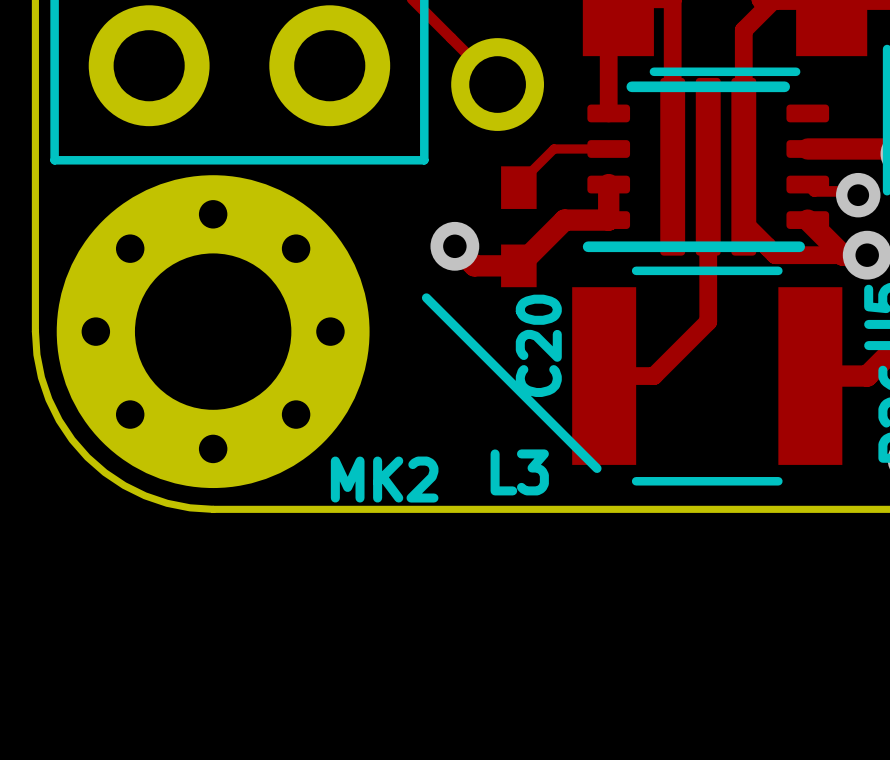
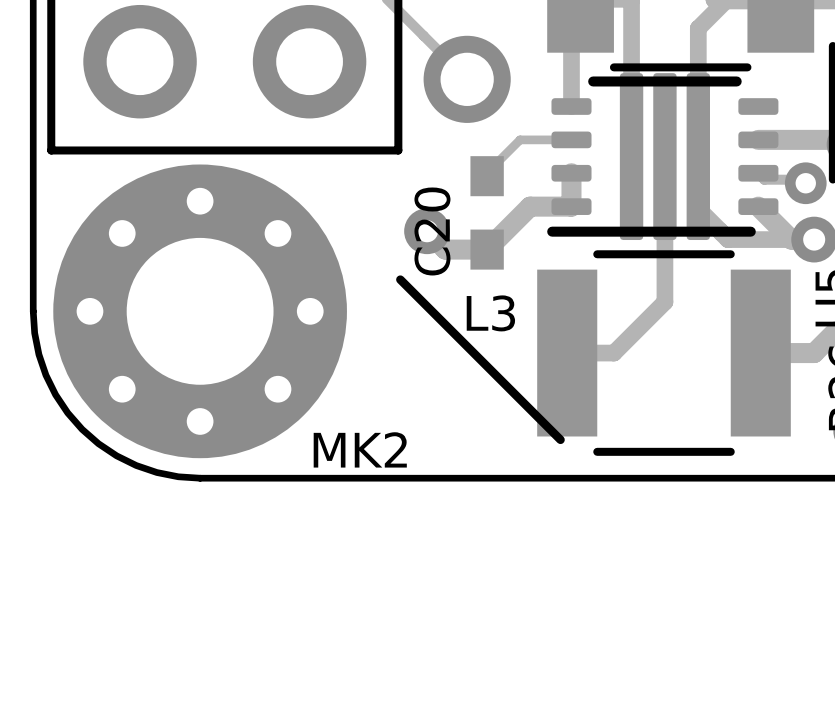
C20 name position: C20 (538, 345) -> C20 (432, 231)
L3 name position: L3 (519, 472) -> L3 (490, 313)

